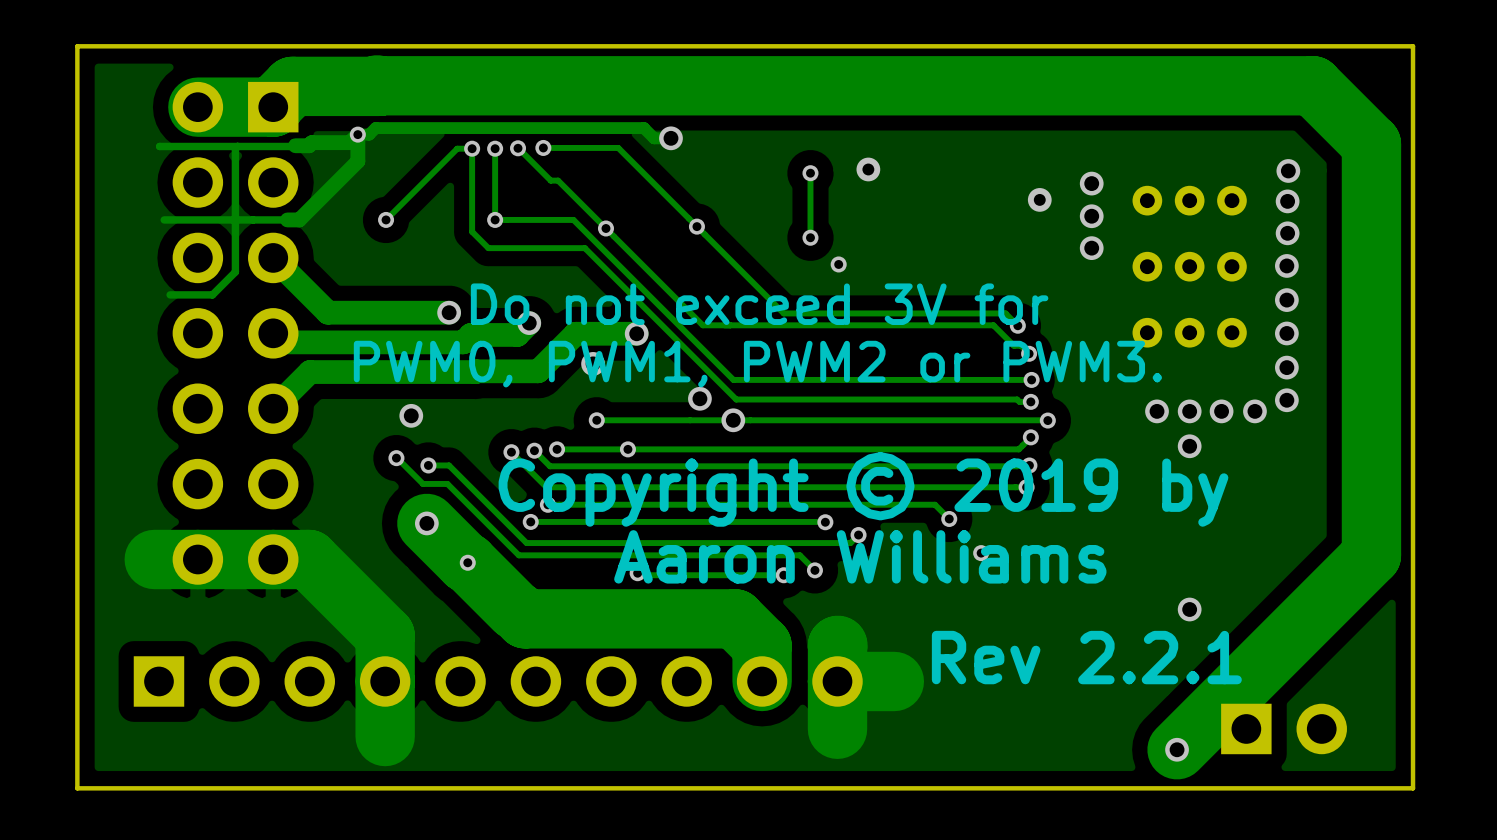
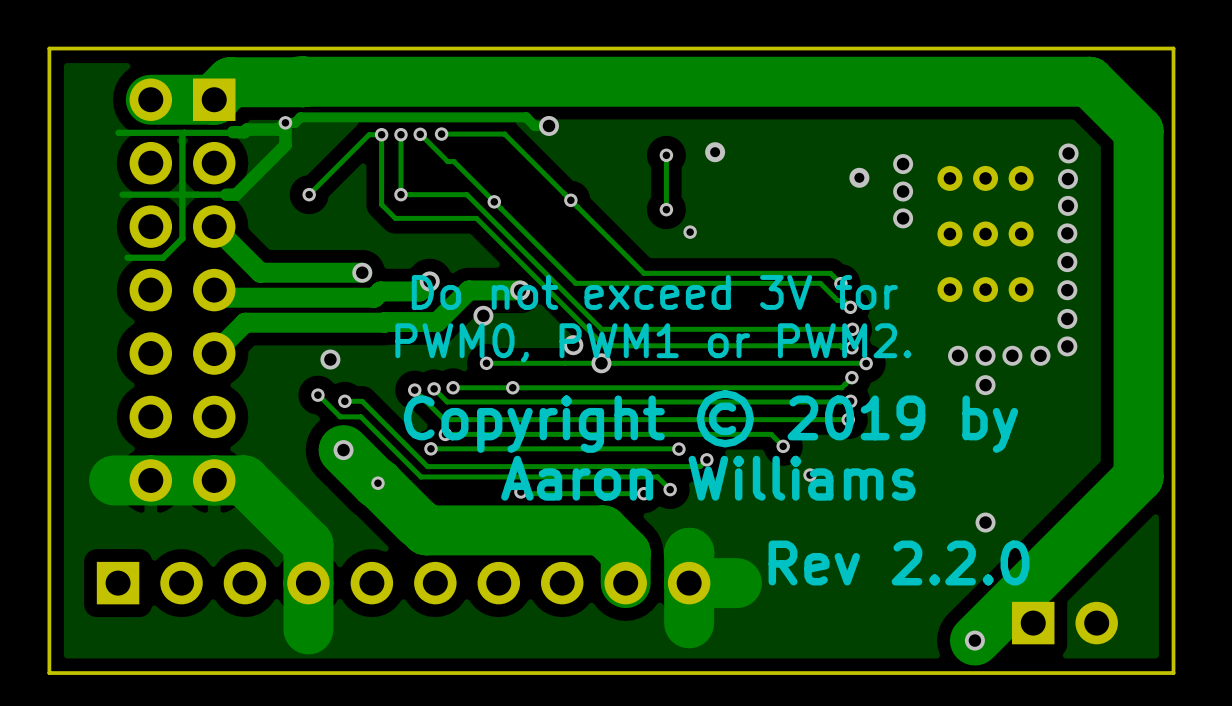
text position: Do not exceed 3V for (759, 304) -> Do not exceed 3V for (654, 292)
text: PWM0, PWM1, PWM2 or PWM3. (757, 364) -> PWM0, PWM1 or PWM2. (653, 342)
text: Rev 2.2.1 (1086, 657) -> Rev 2.2.0 (898, 562)

